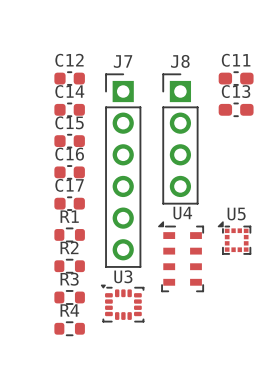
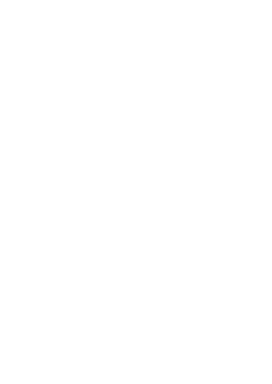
C12: (69, 78) -> none
C11: (236, 78) -> none
C14: (69, 109) -> none
C13: (236, 109) -> none
J8: (180, 138) -> none
C15: (69, 141) -> none
J7: (123, 170) -> none
C16: (69, 172) -> none
C17: (69, 203) -> none
R1: (69, 234) -> none
U5: (234, 237) -> none
U4: (180, 256) -> none
R2: (69, 266) -> none
R3: (69, 297) -> none
U3: (122, 303) -> none
R4: (69, 328) -> none

